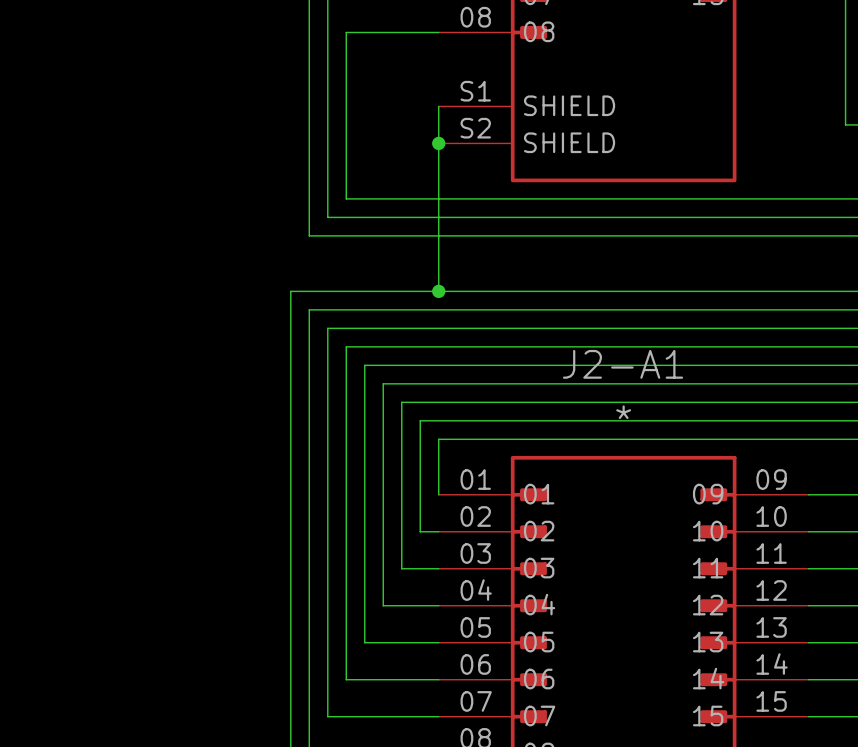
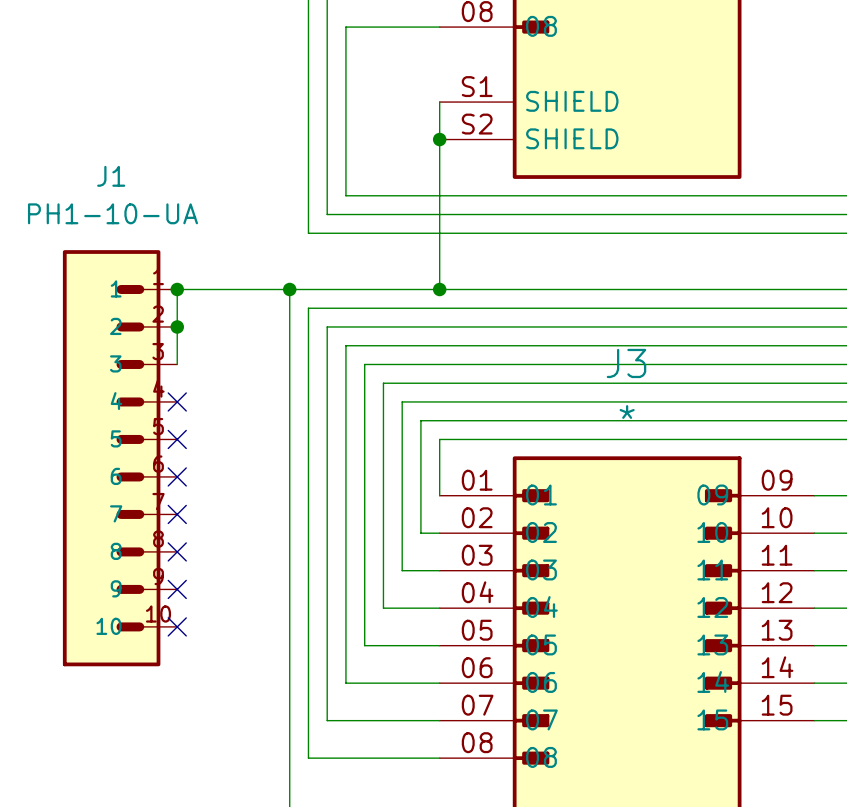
junction: none -> (177, 289)
wire: none -> (289, 289) (177, 289) (177, 364)
junction: none -> (289, 289)
junction: none -> (177, 326)
J2-A1 name: J2-A1 (623, 364) -> J3 (626, 363)
no-connect mark: none -> (177, 401)
no-connect mark: none -> (177, 439)
J1: none -> PH1-10-UA (120, 458)
no-connect mark: none -> (177, 476)
no-connect mark: none -> (177, 514)
no-connect mark: none -> (177, 551)
no-connect mark: none -> (177, 589)
no-connect mark: none -> (177, 626)

